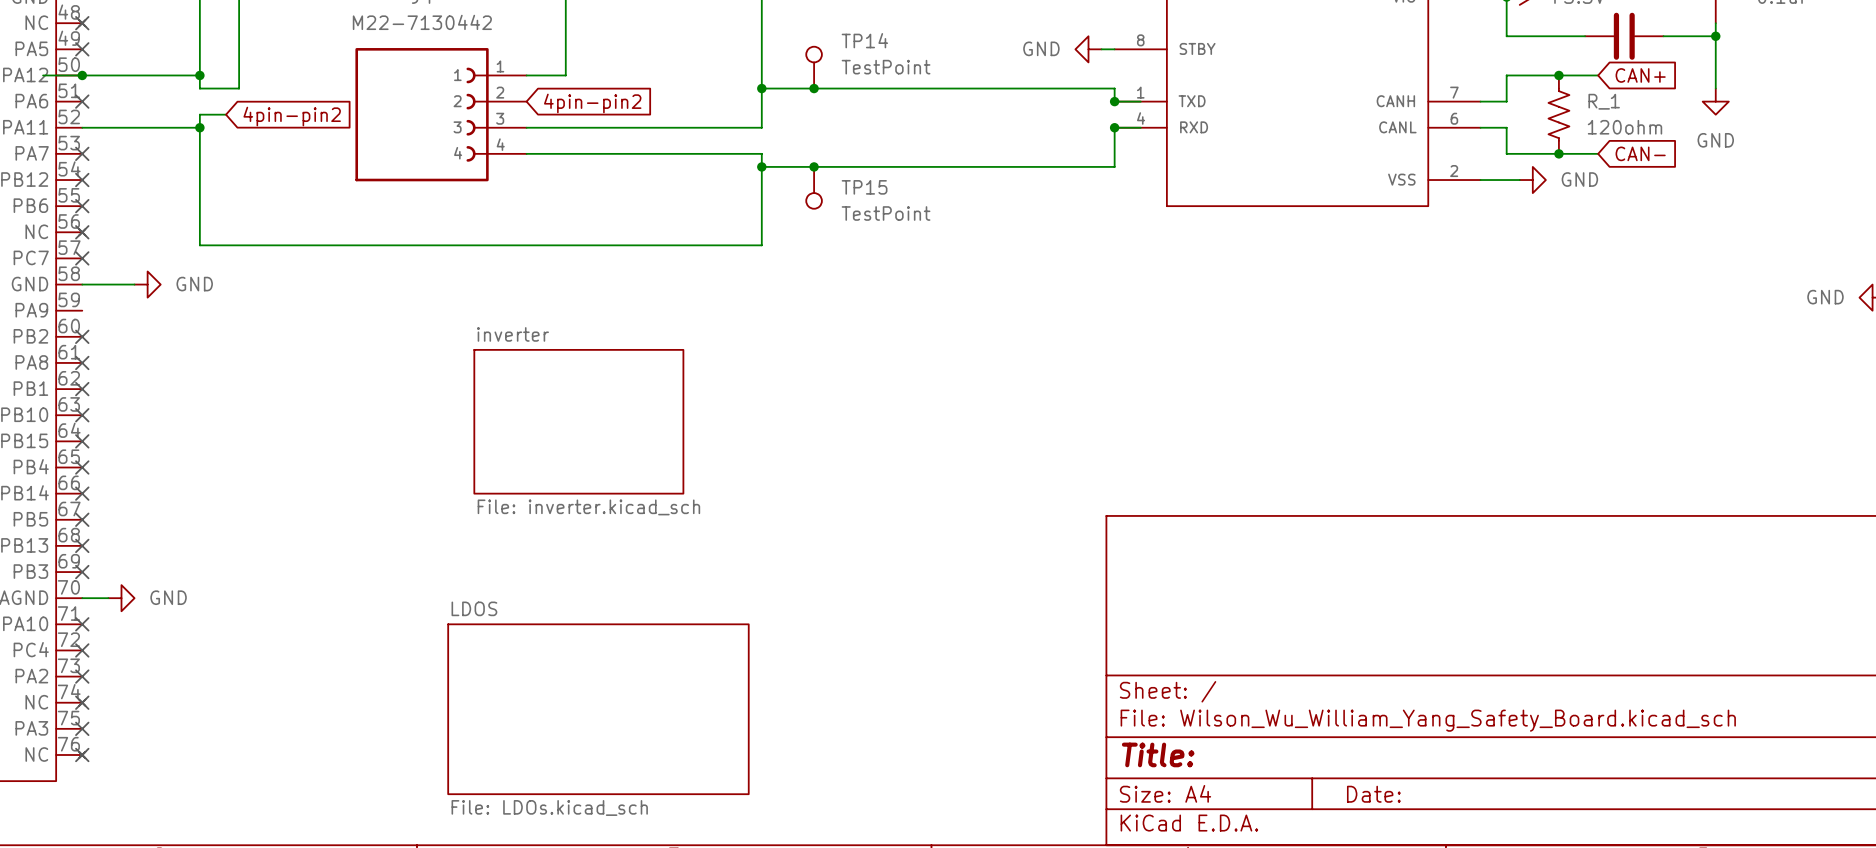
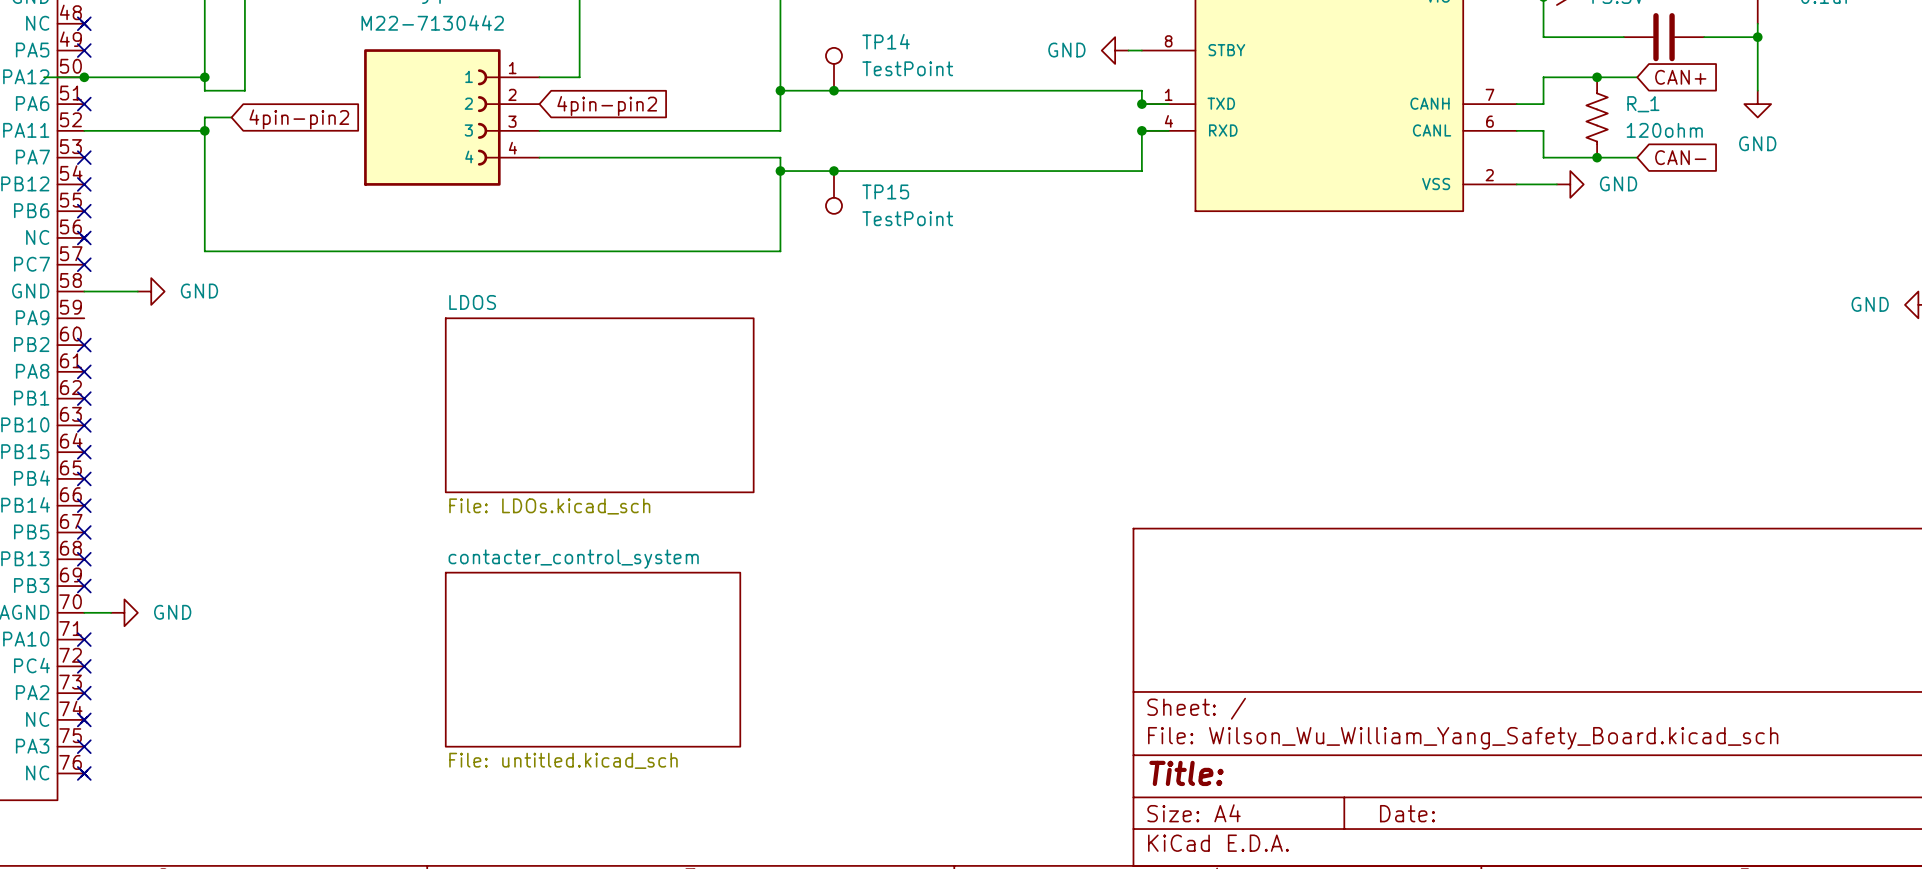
sheet LDOS: none -> File: LDOs.kicad_sch (599, 405)
sheet inverter: File: inverter.kicad_sch (578, 421) -> none
sheet contacter_control_system: none -> File: untitled.kicad_sch (593, 659)
sheet LDOS: File: LDOs.kicad_sch (598, 709) -> none

